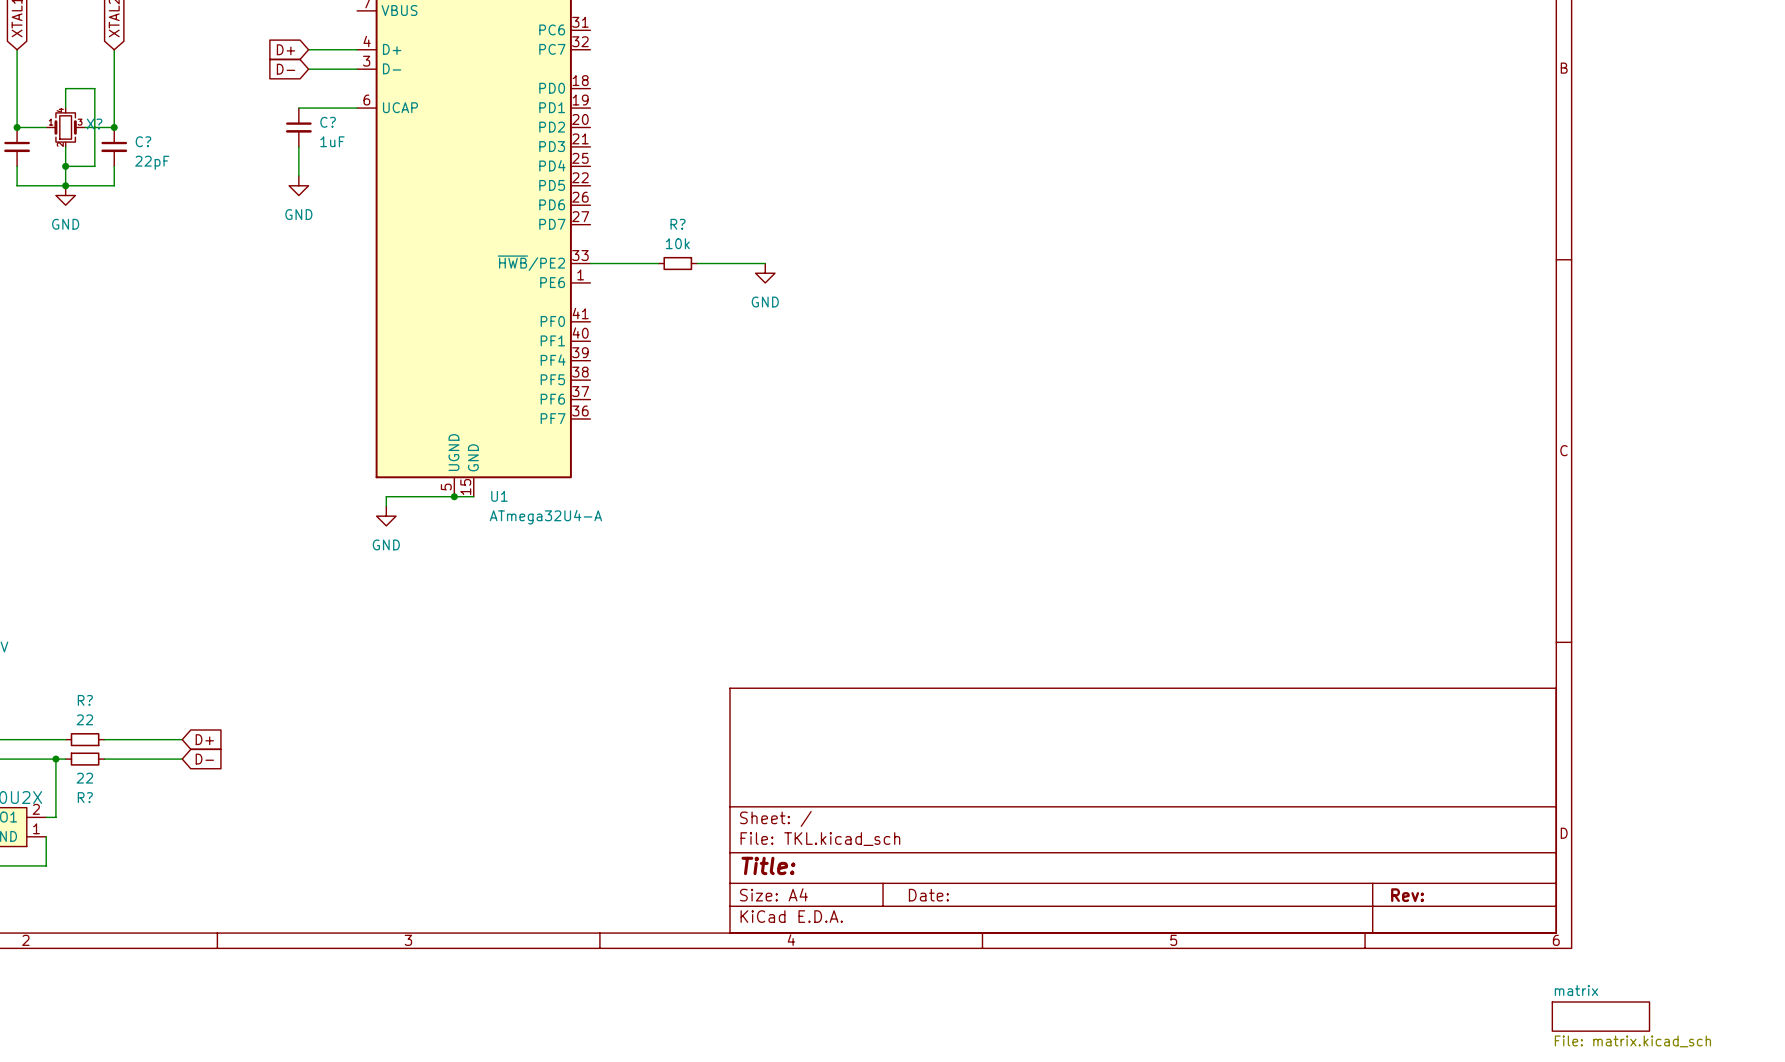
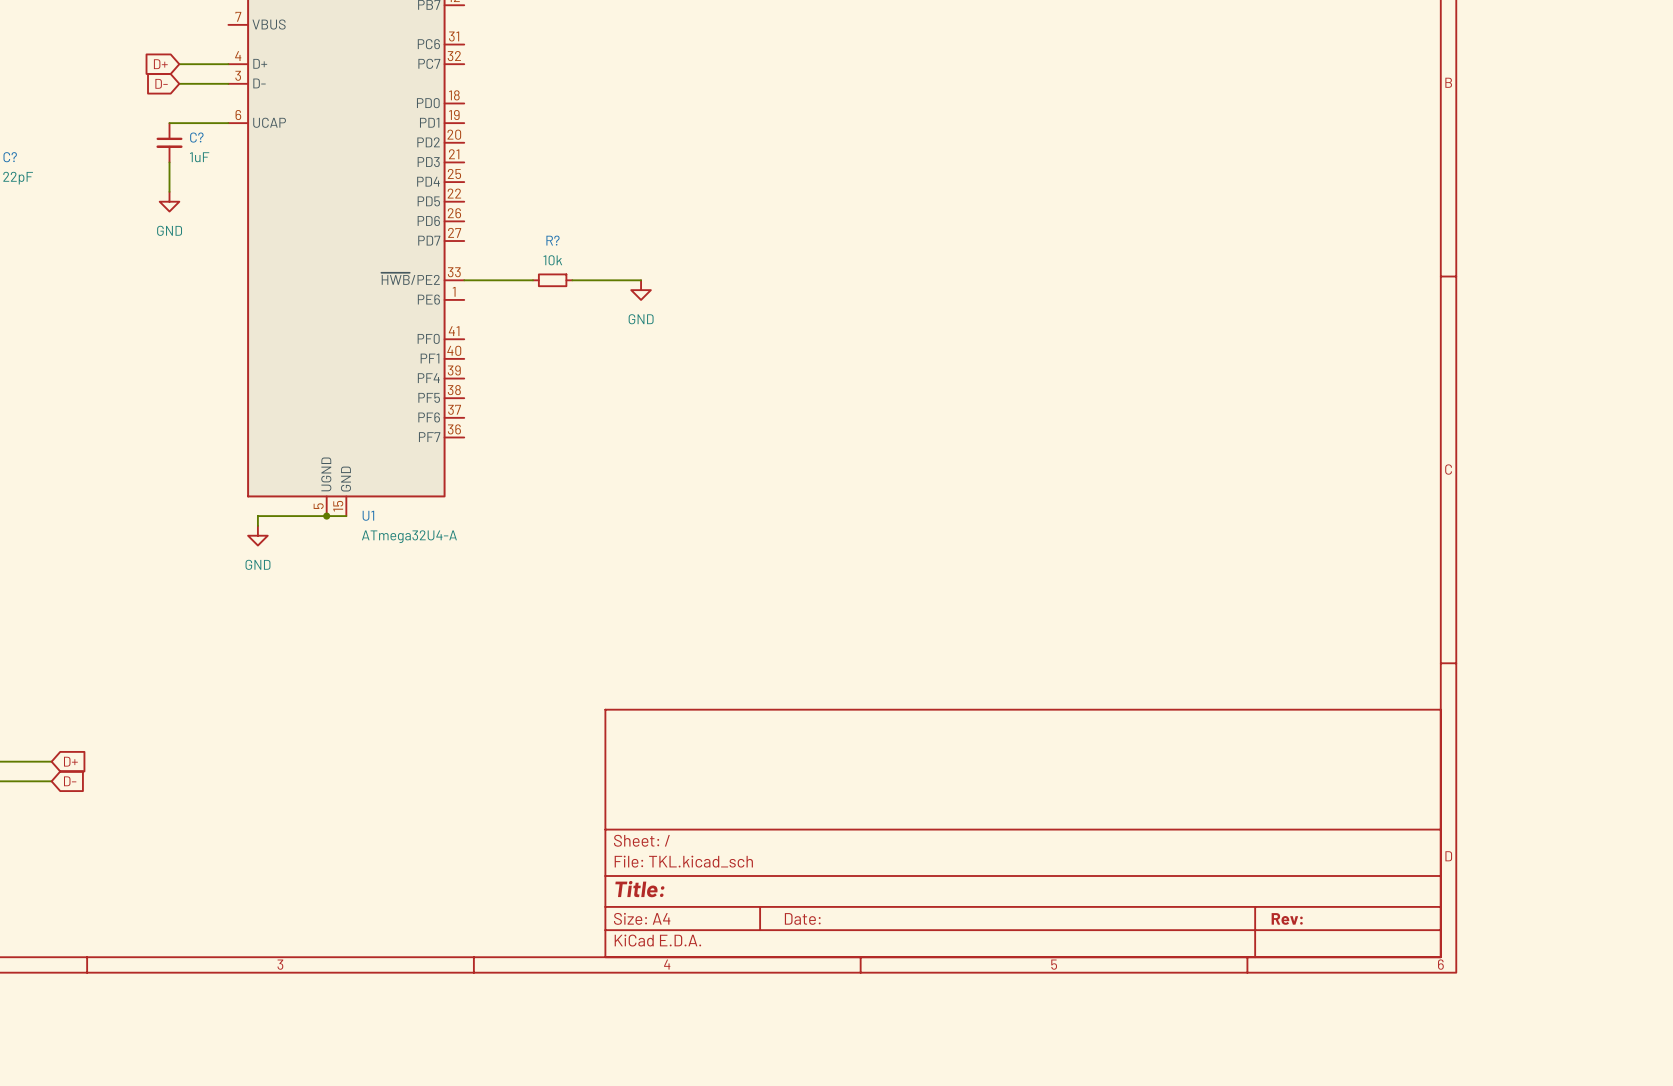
sheet matrix: File: matrix.kicad_sch (1600, 1016) -> none

